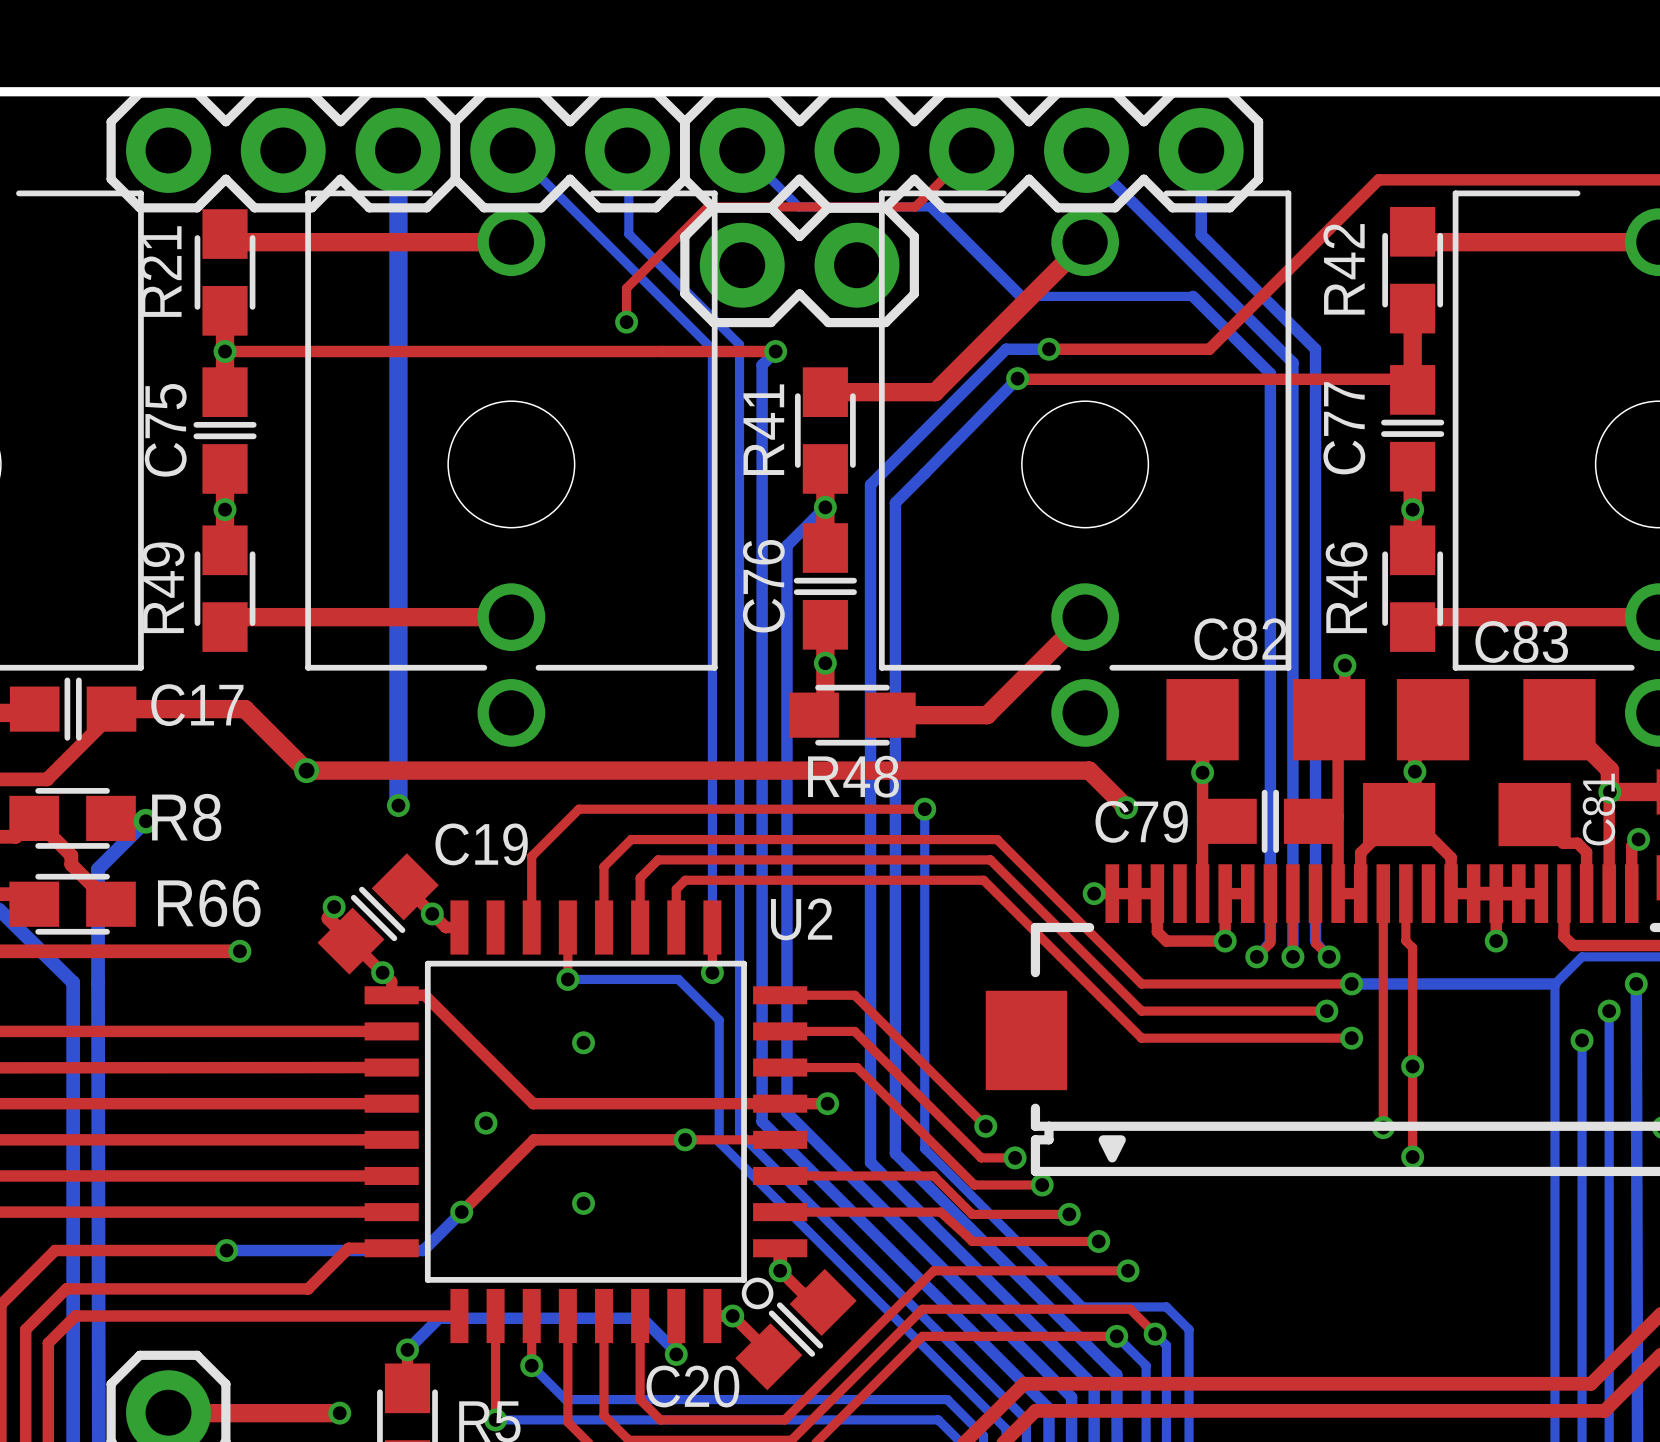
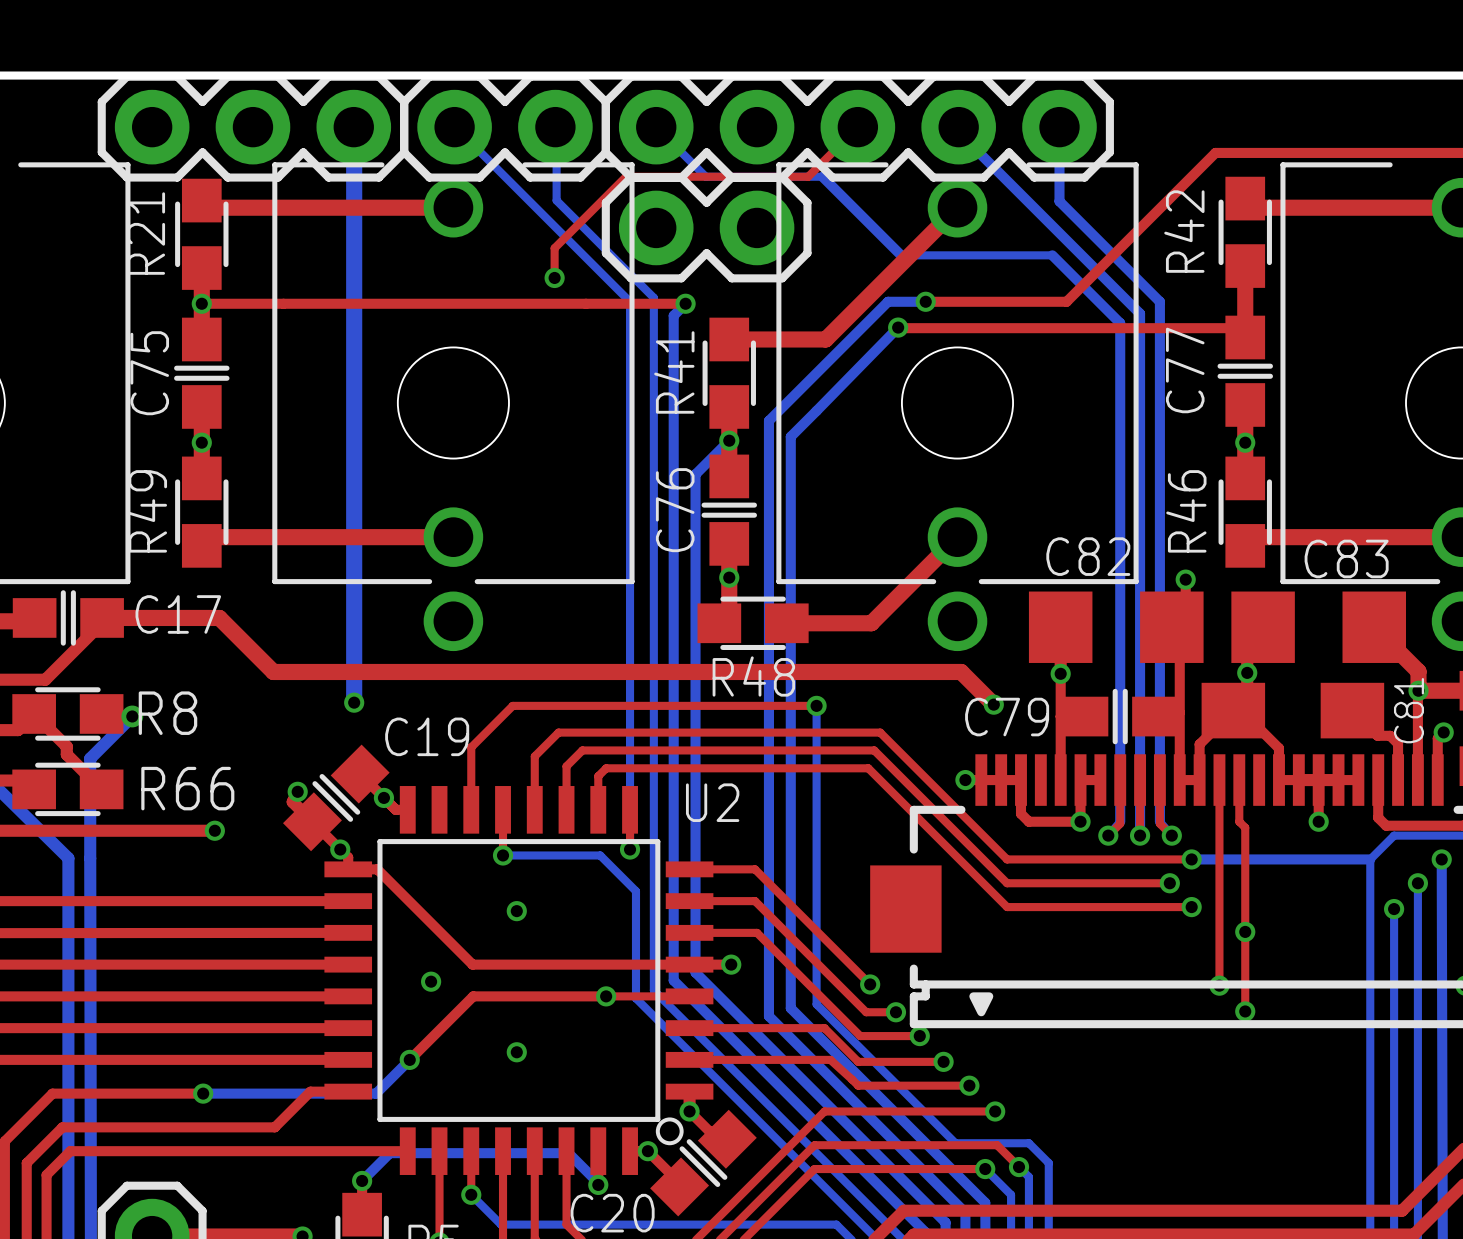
via: (306, 770) -> none

